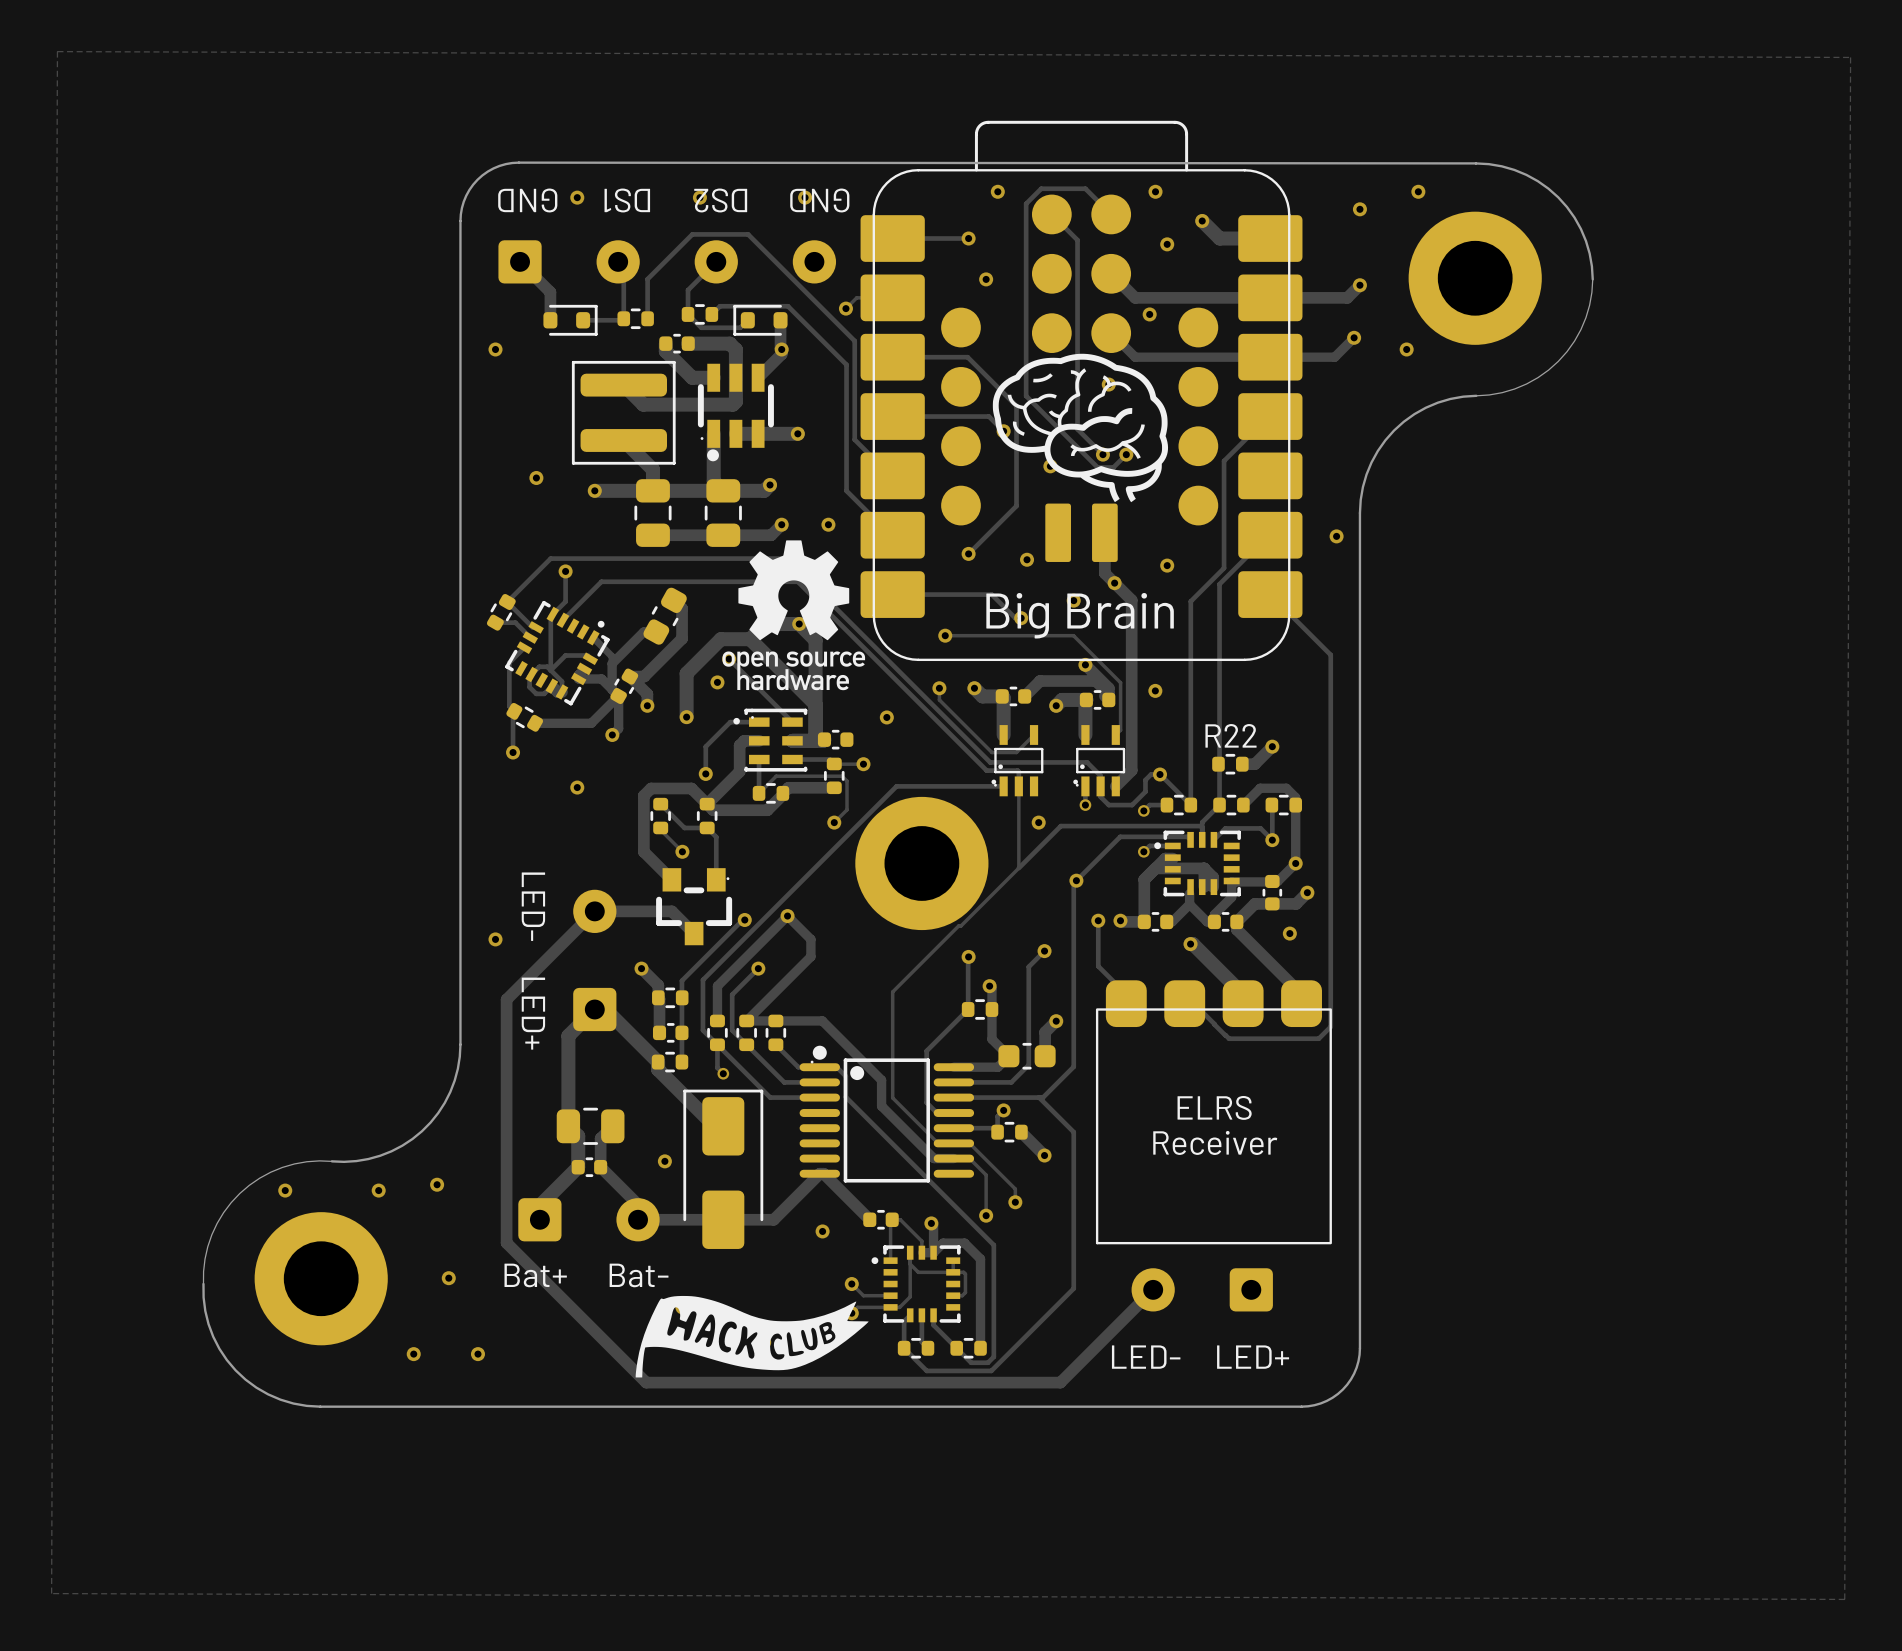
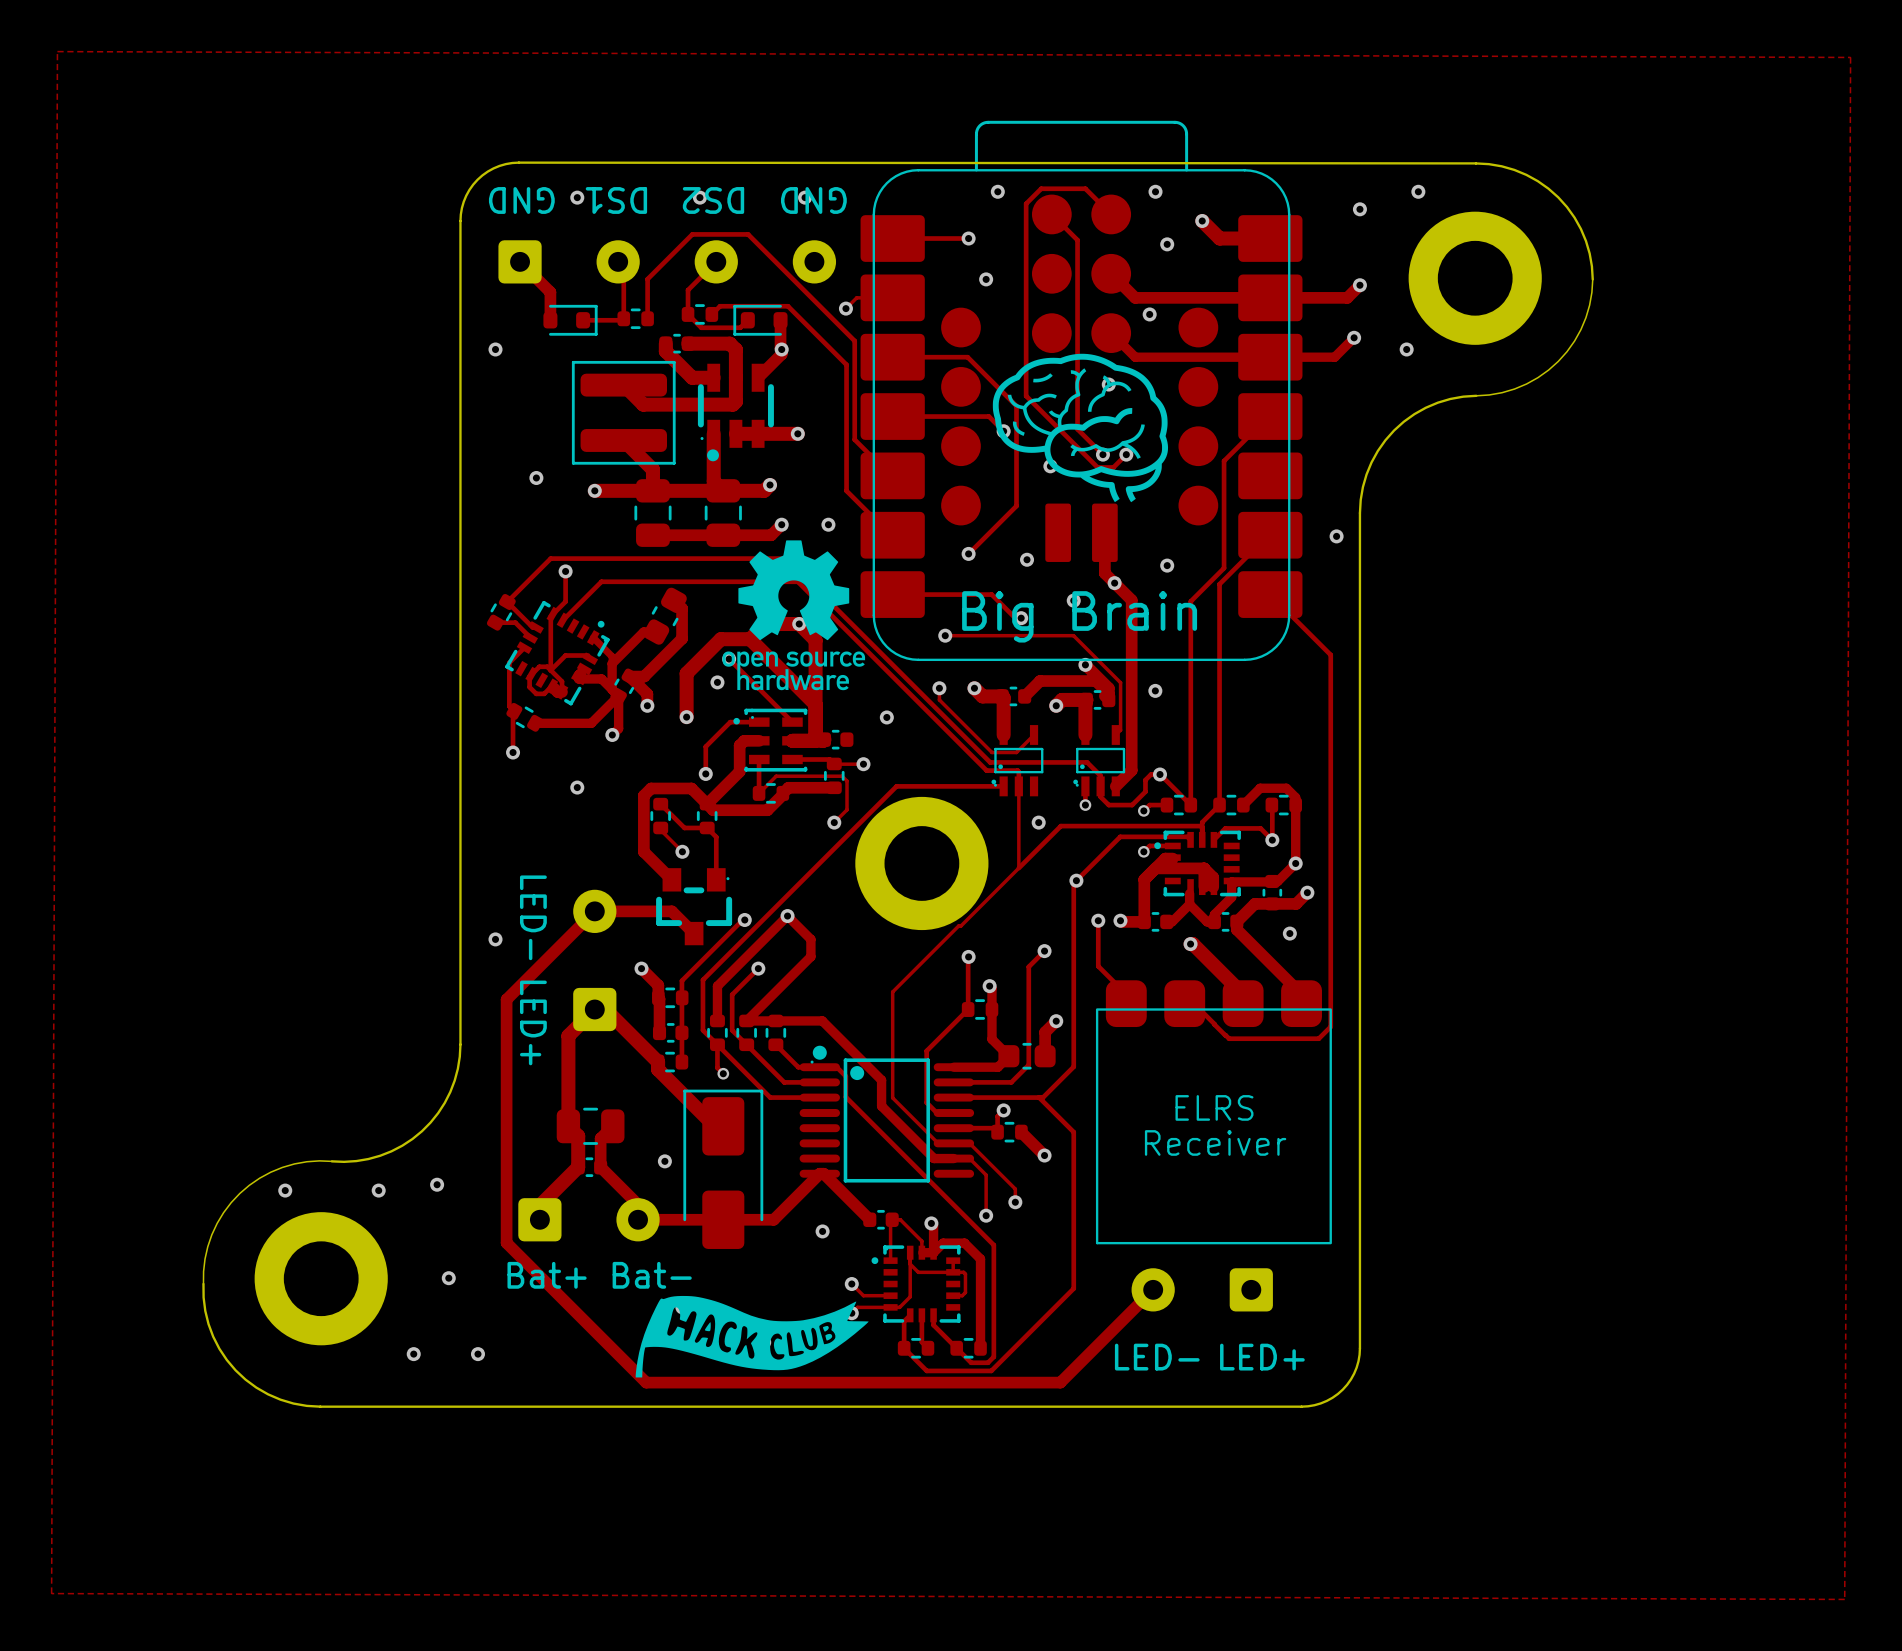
track: (1272, 746) (1254, 764) (1242, 764) -> none
via: (1272, 746) -> none
R22: (1230, 764) -> none

